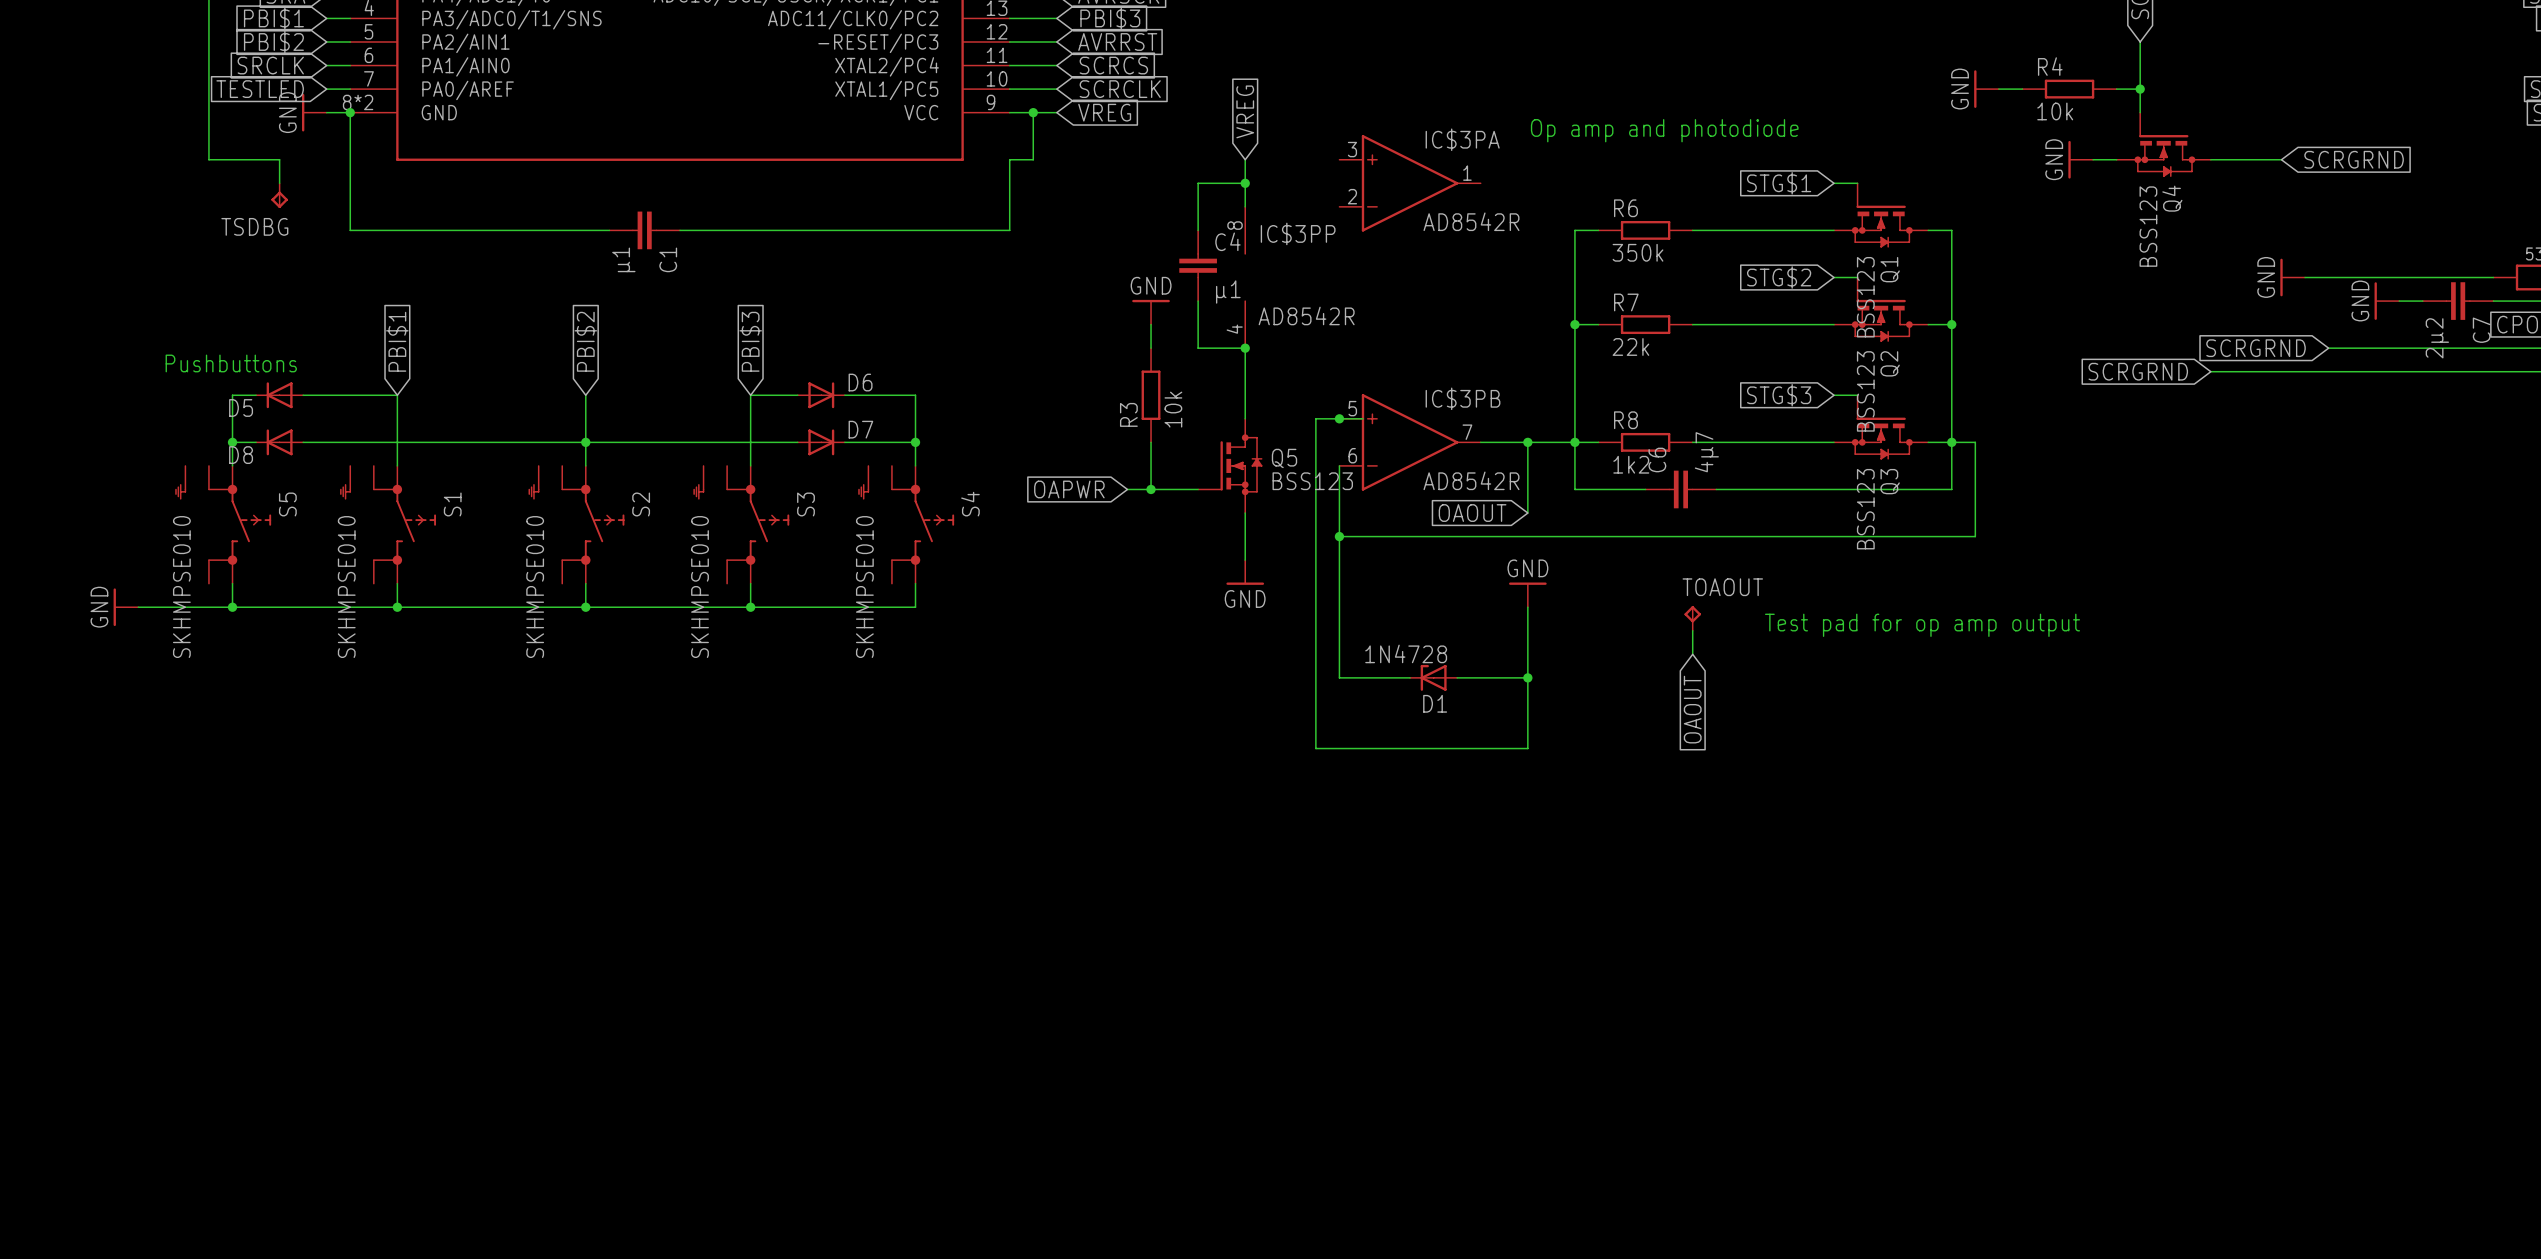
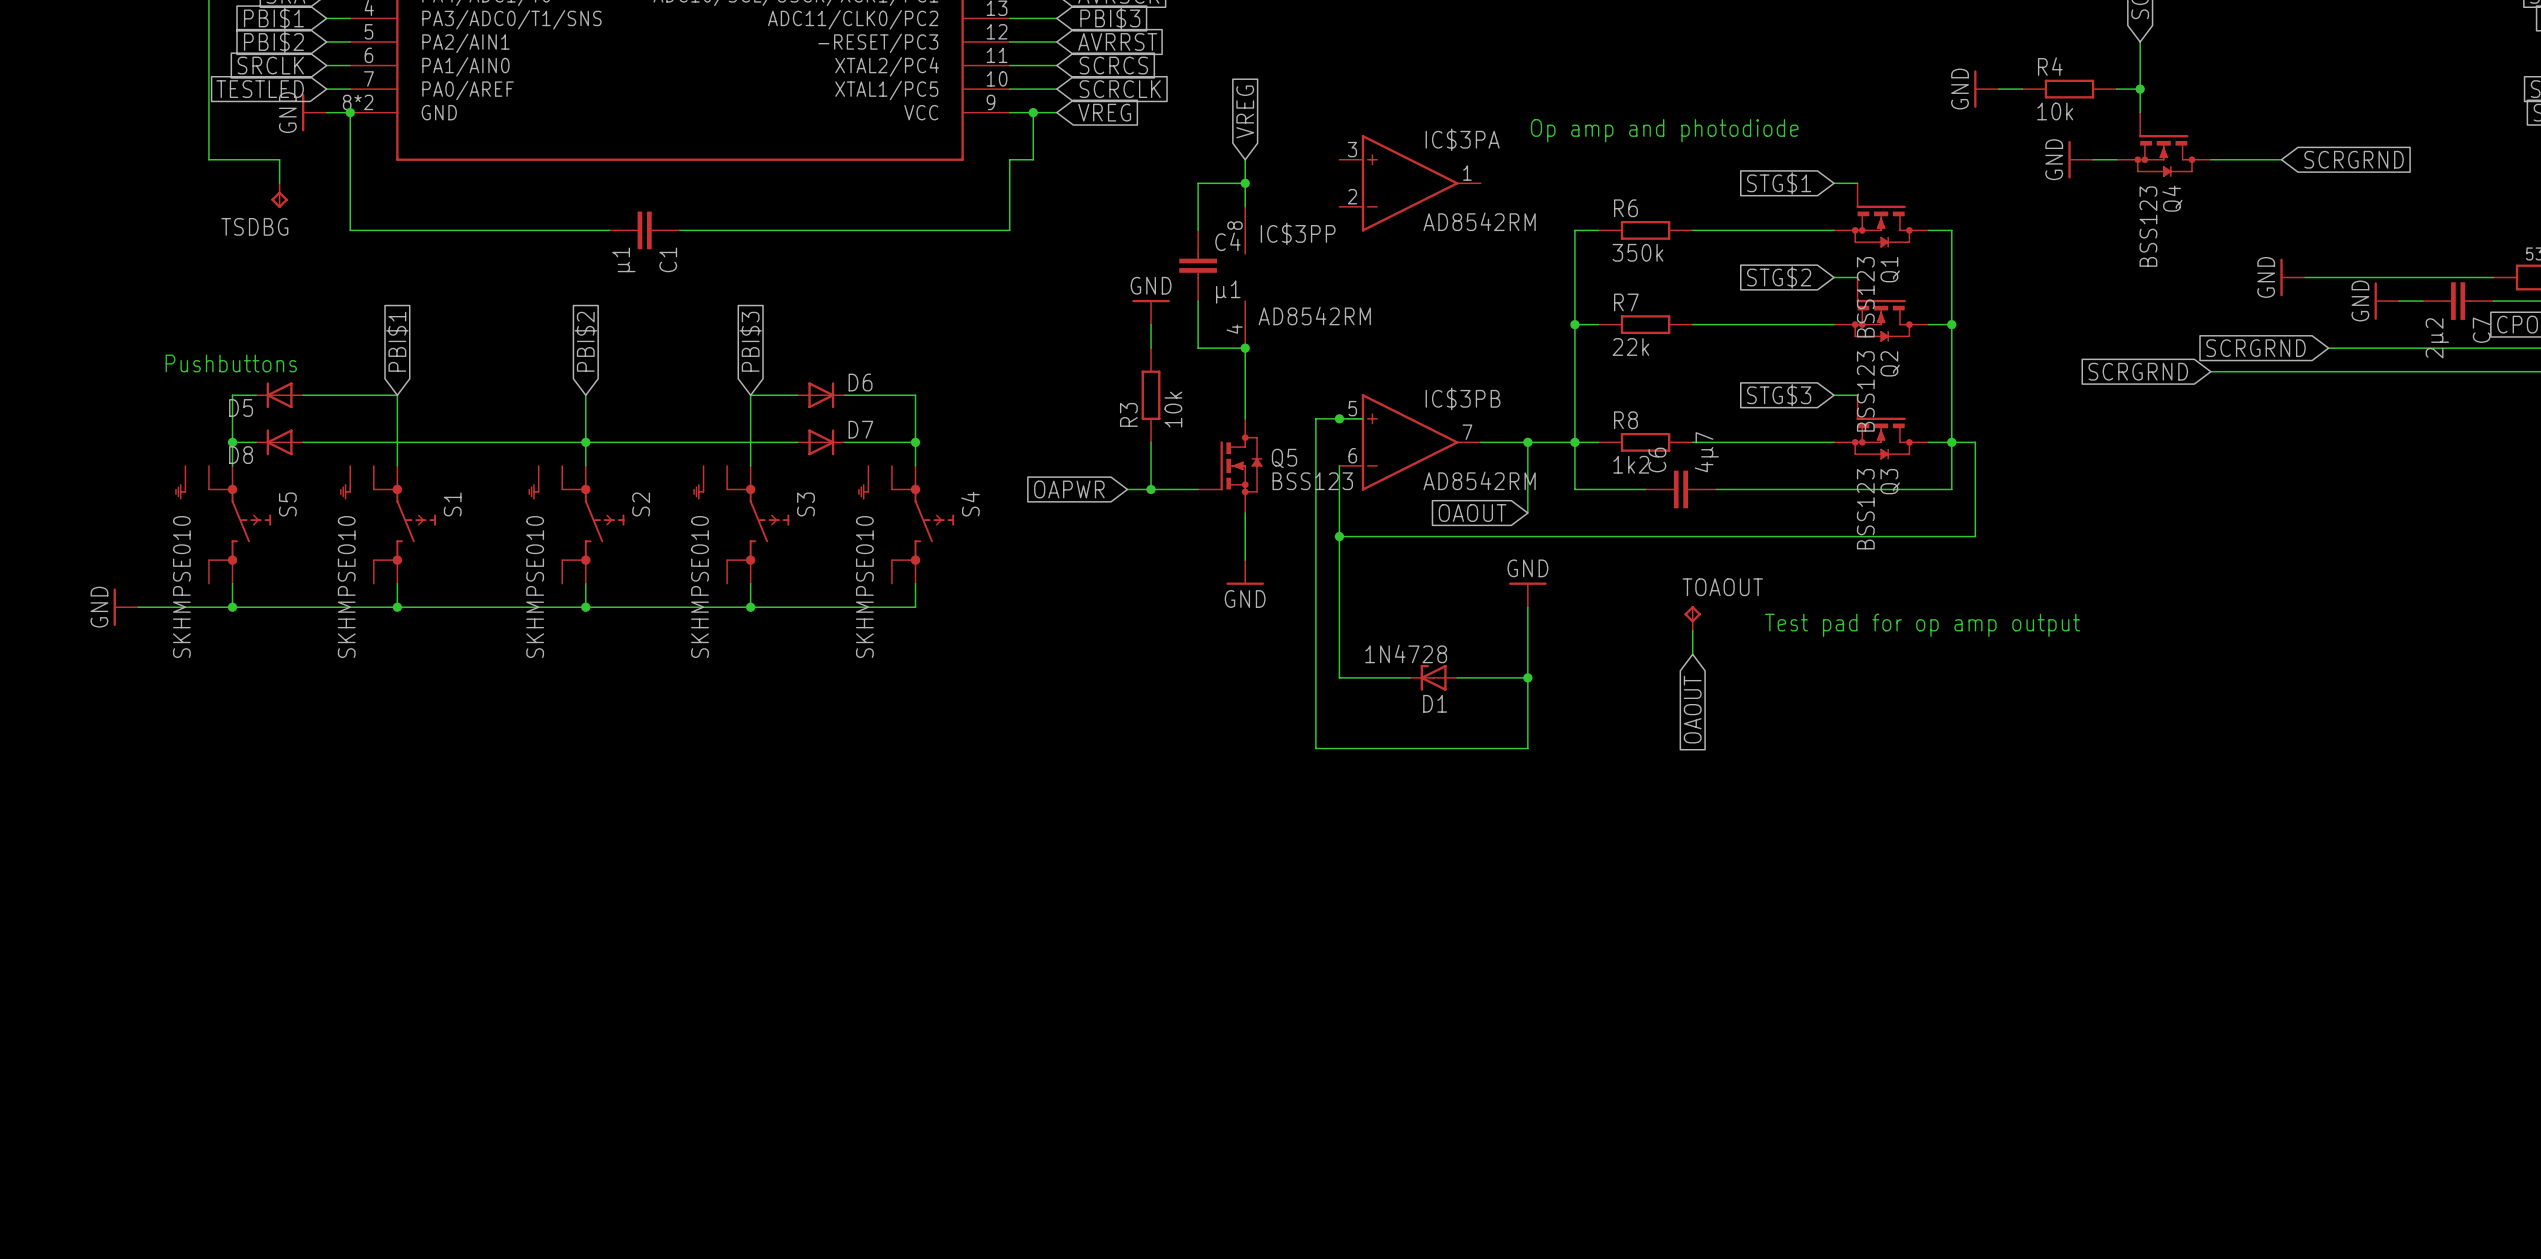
IC$3PA value: AD8542R (1471, 221) -> AD8542RM (1479, 221)
IC$3PP value: AD8542R (1306, 315) -> AD8542RM (1314, 315)
IC$3PB value: AD8542R (1471, 480) -> AD8542RM (1479, 480)

